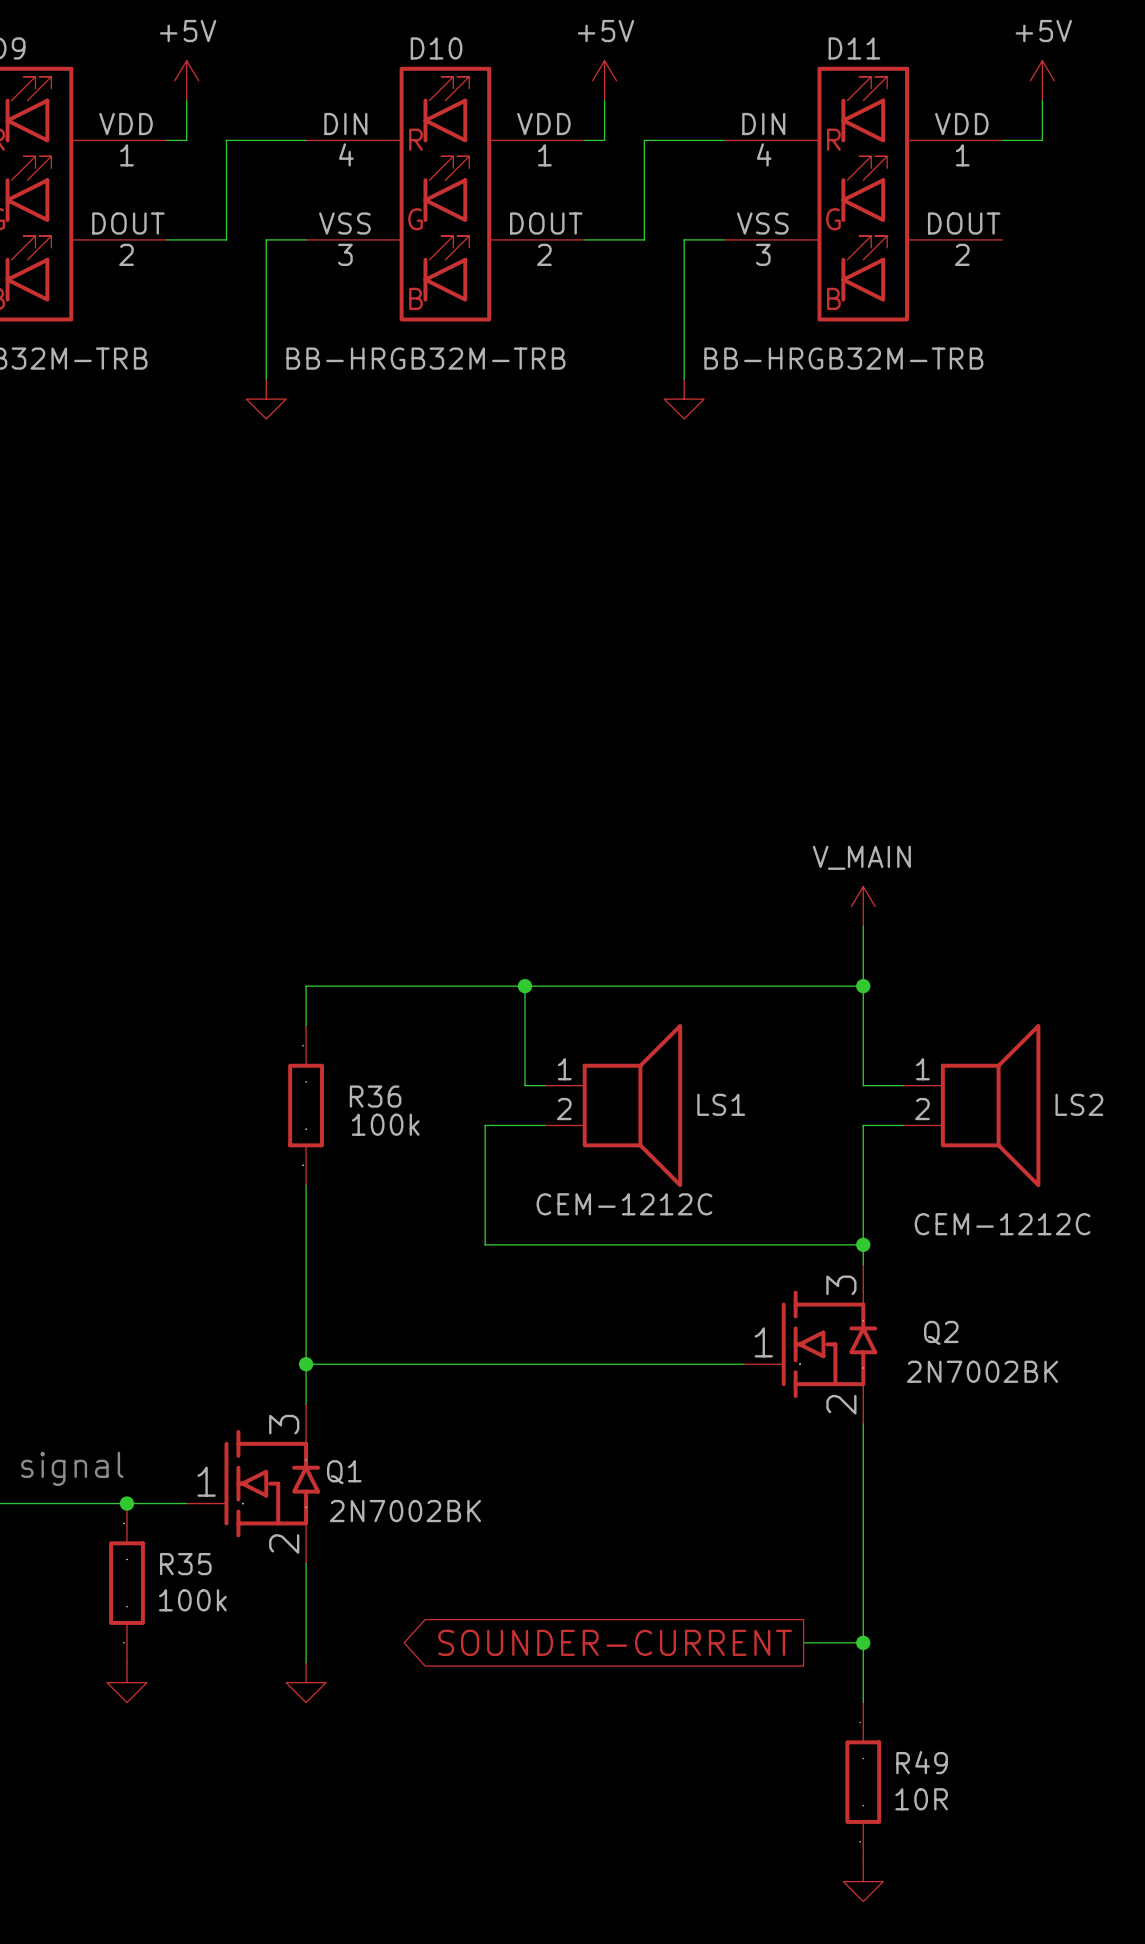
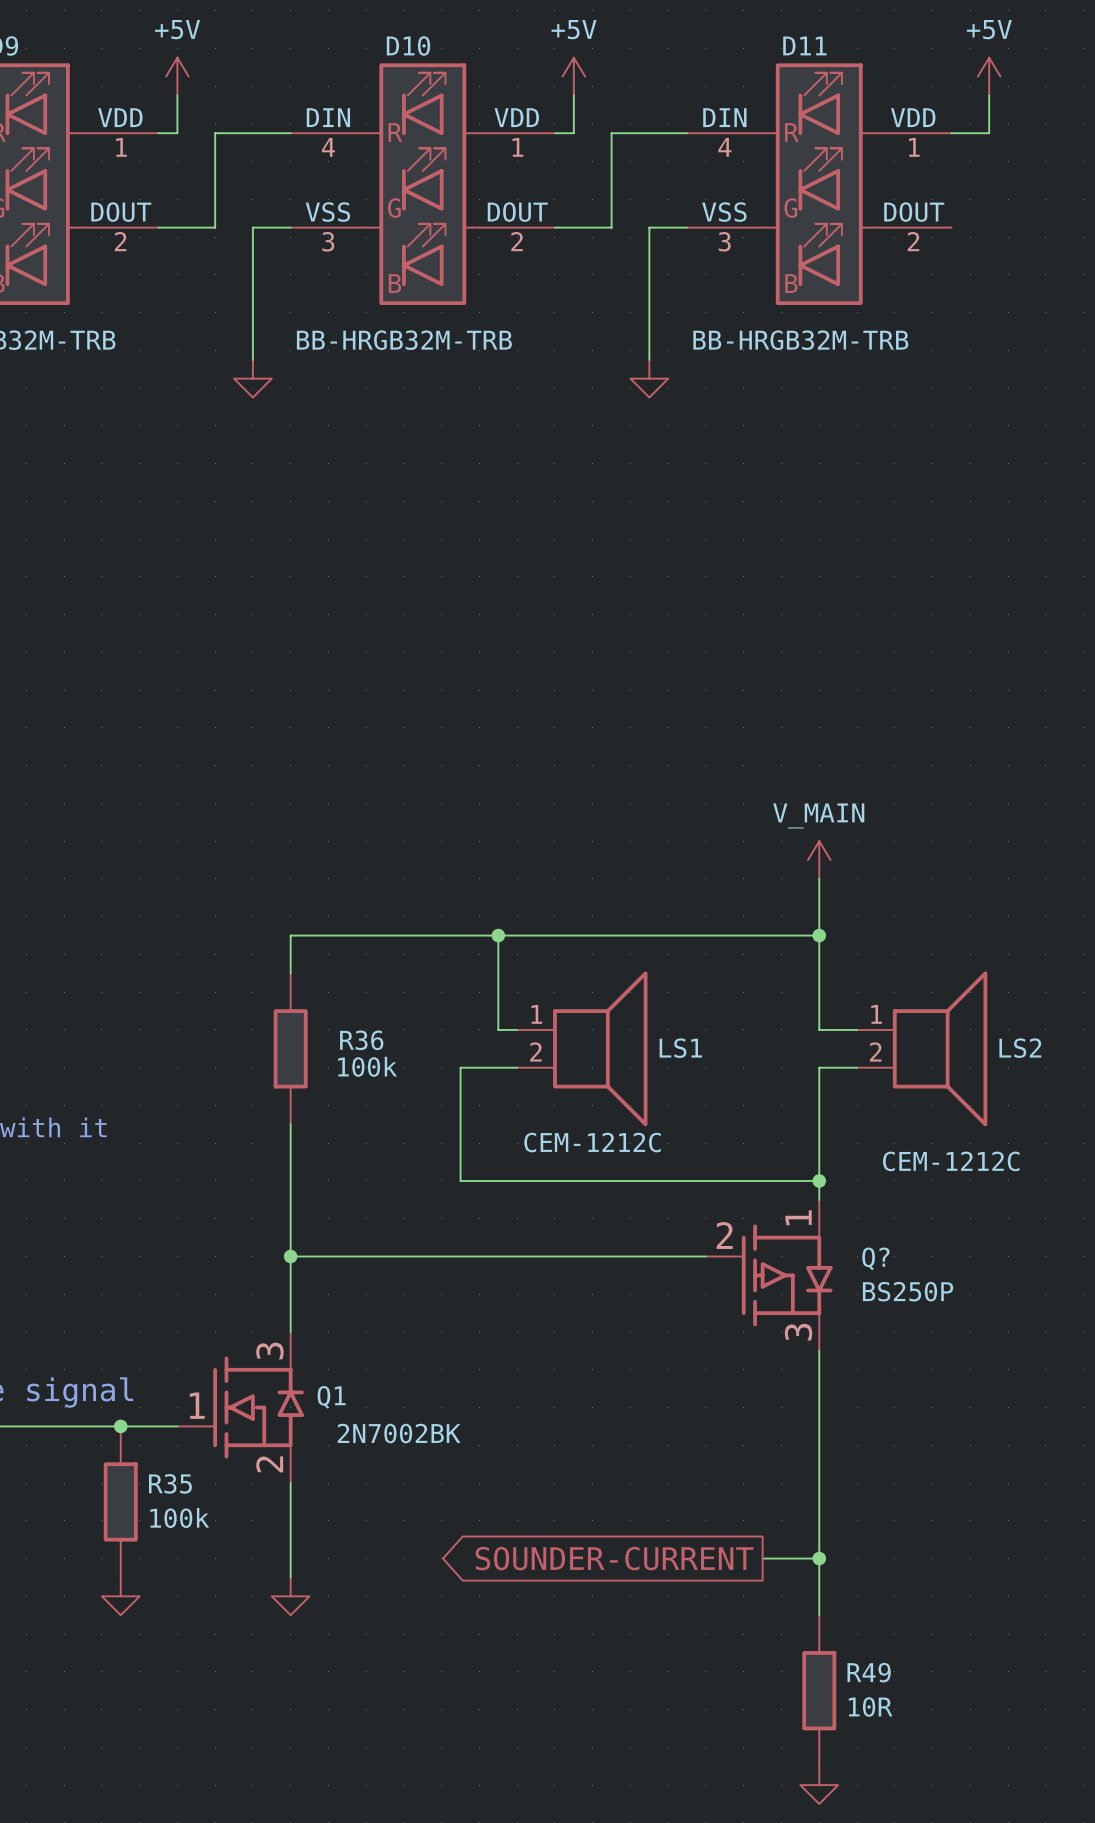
Q2: 2N7002BK (810, 1344) -> none
Q?: none -> BS250P (769, 1275)
wire: (306, 1364) (743, 1364) -> (290, 1256) (705, 1256)
junction position: (306, 1364) -> (290, 1256)

